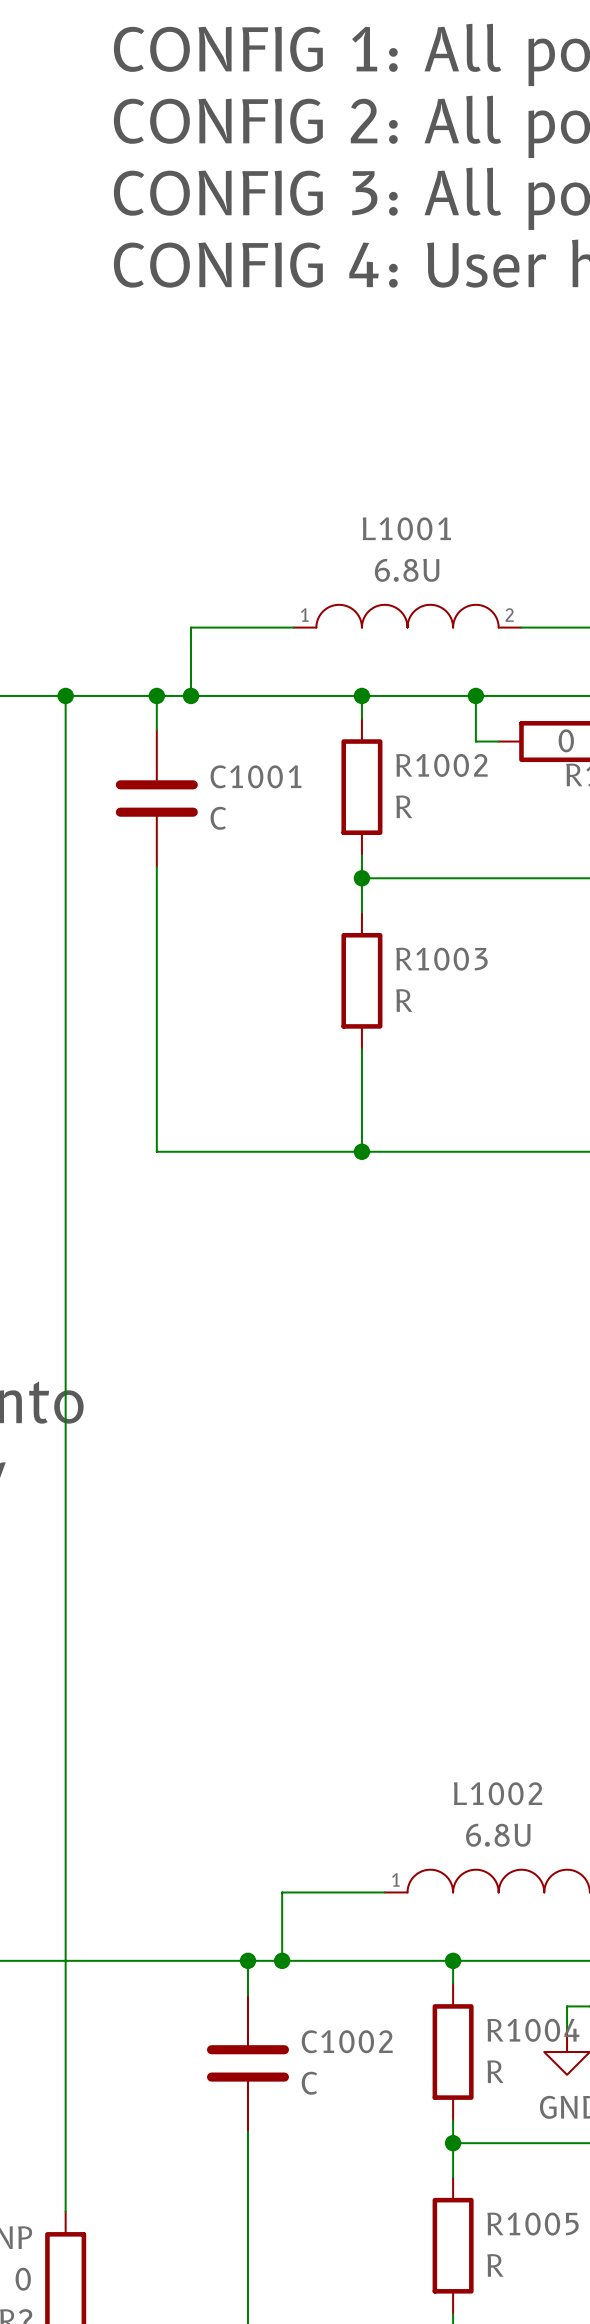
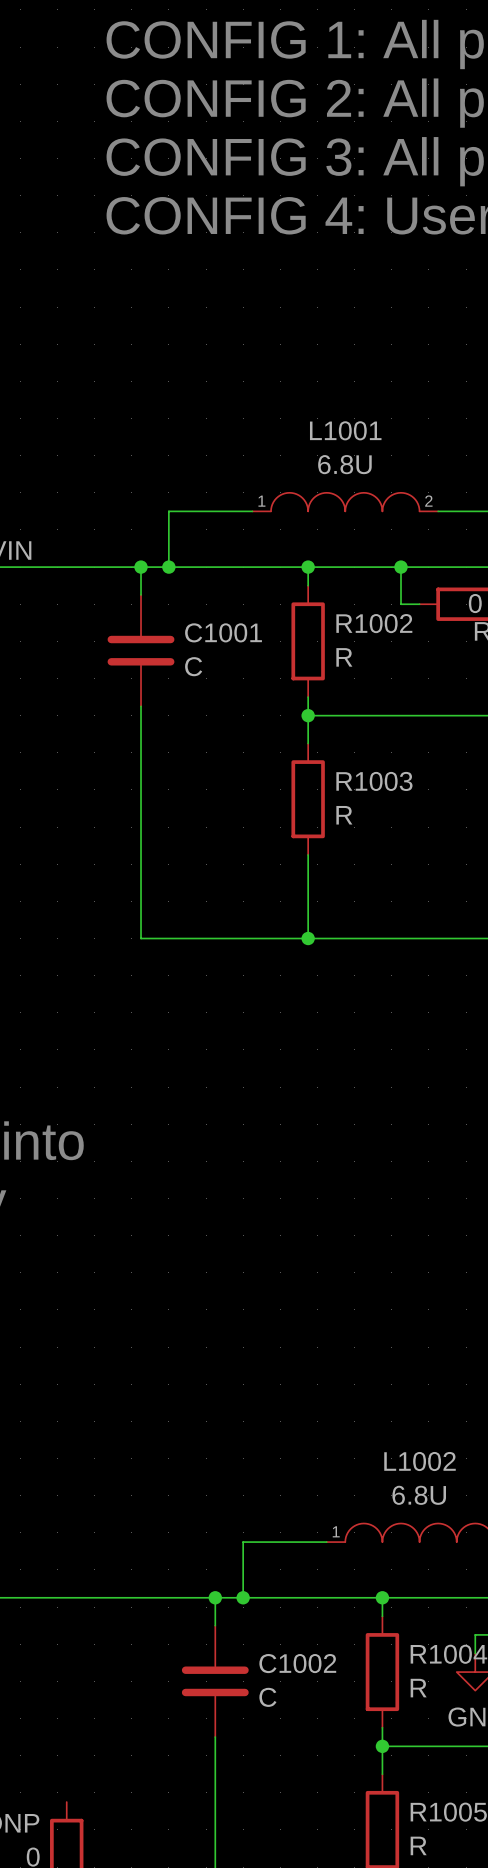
wire: (65, 695) (65, 2211) -> none
junction: (65, 695) -> none

